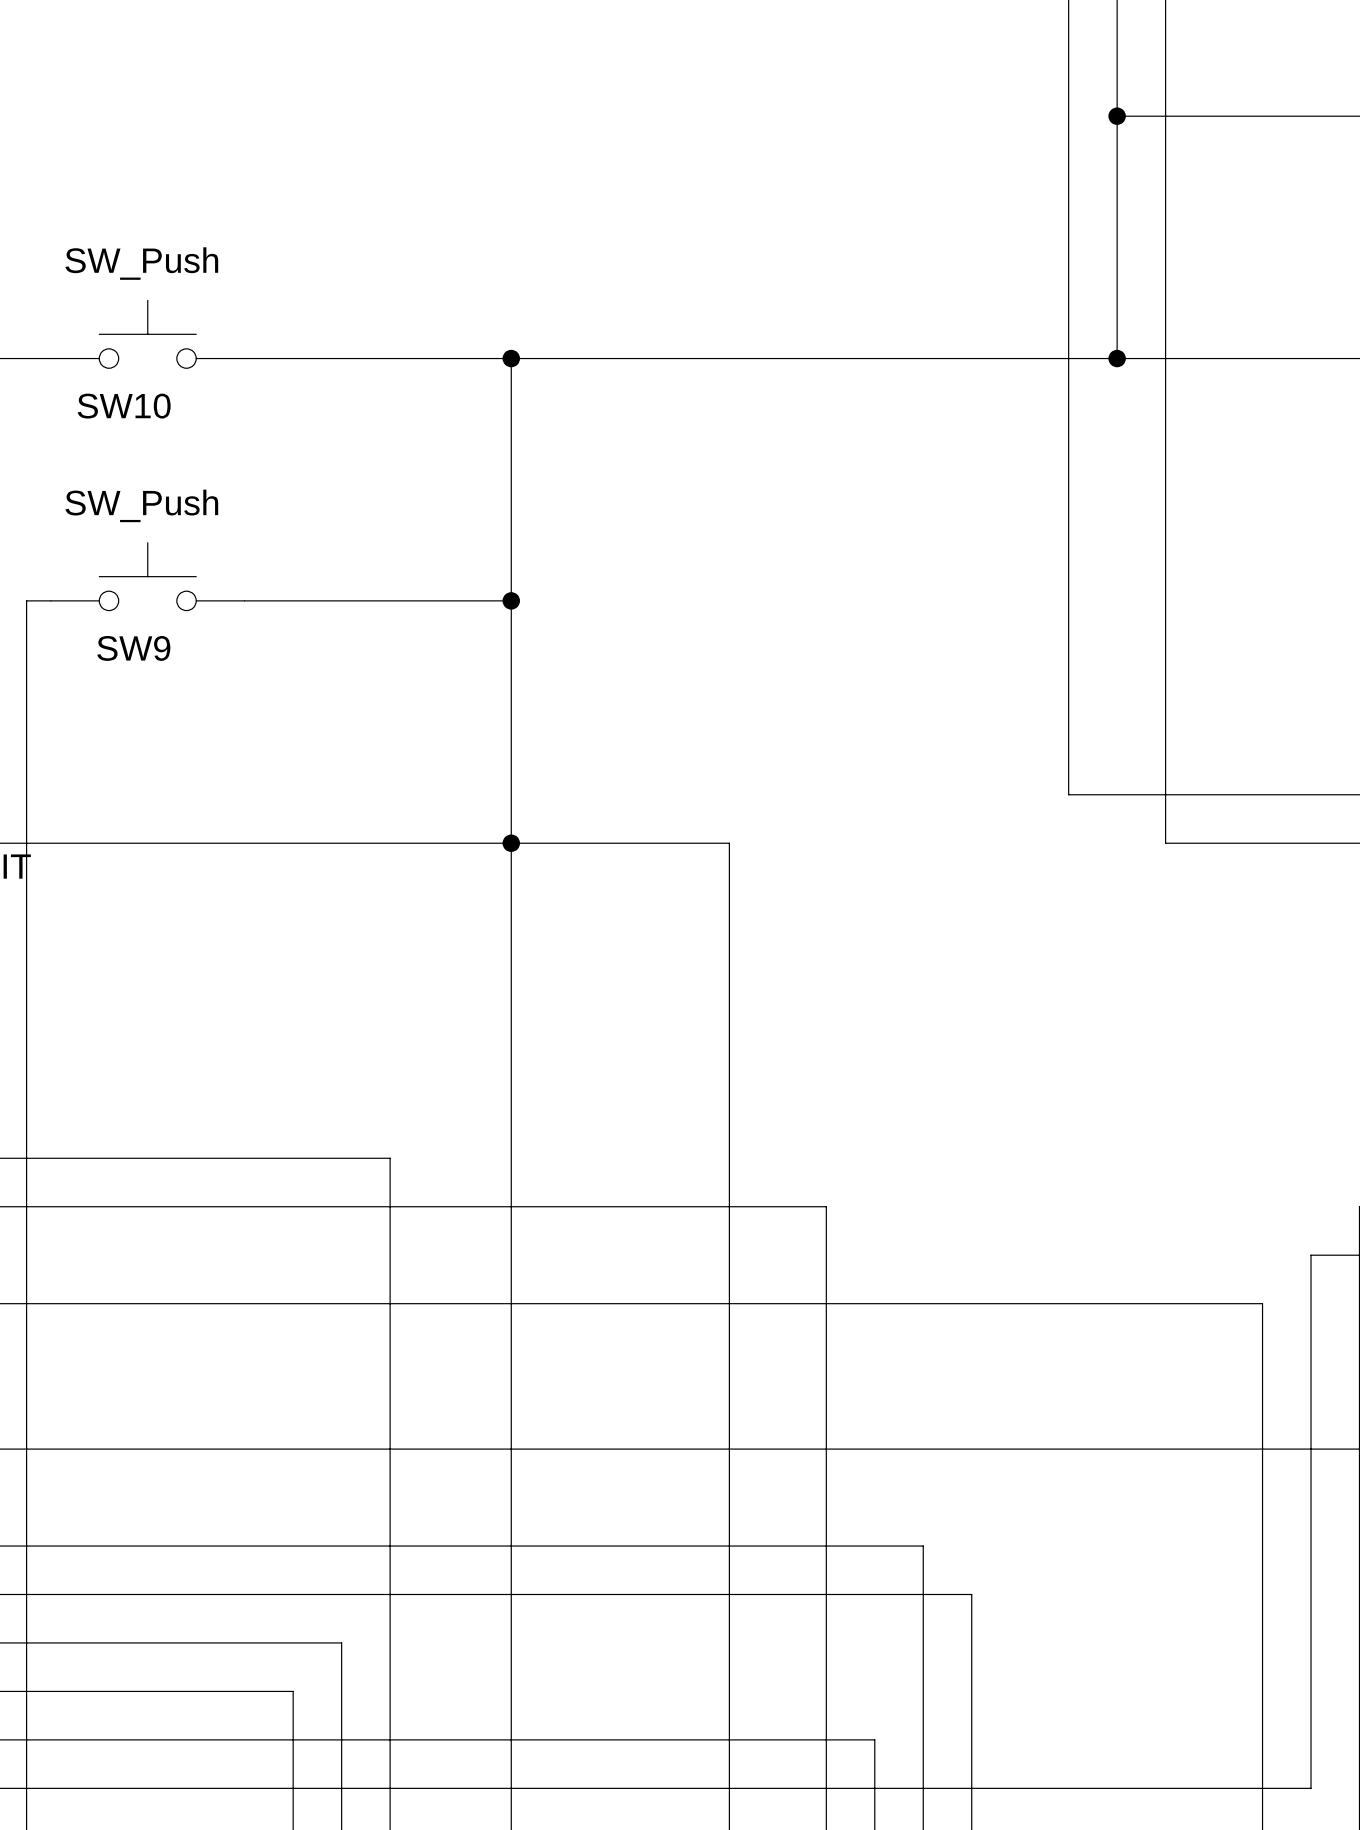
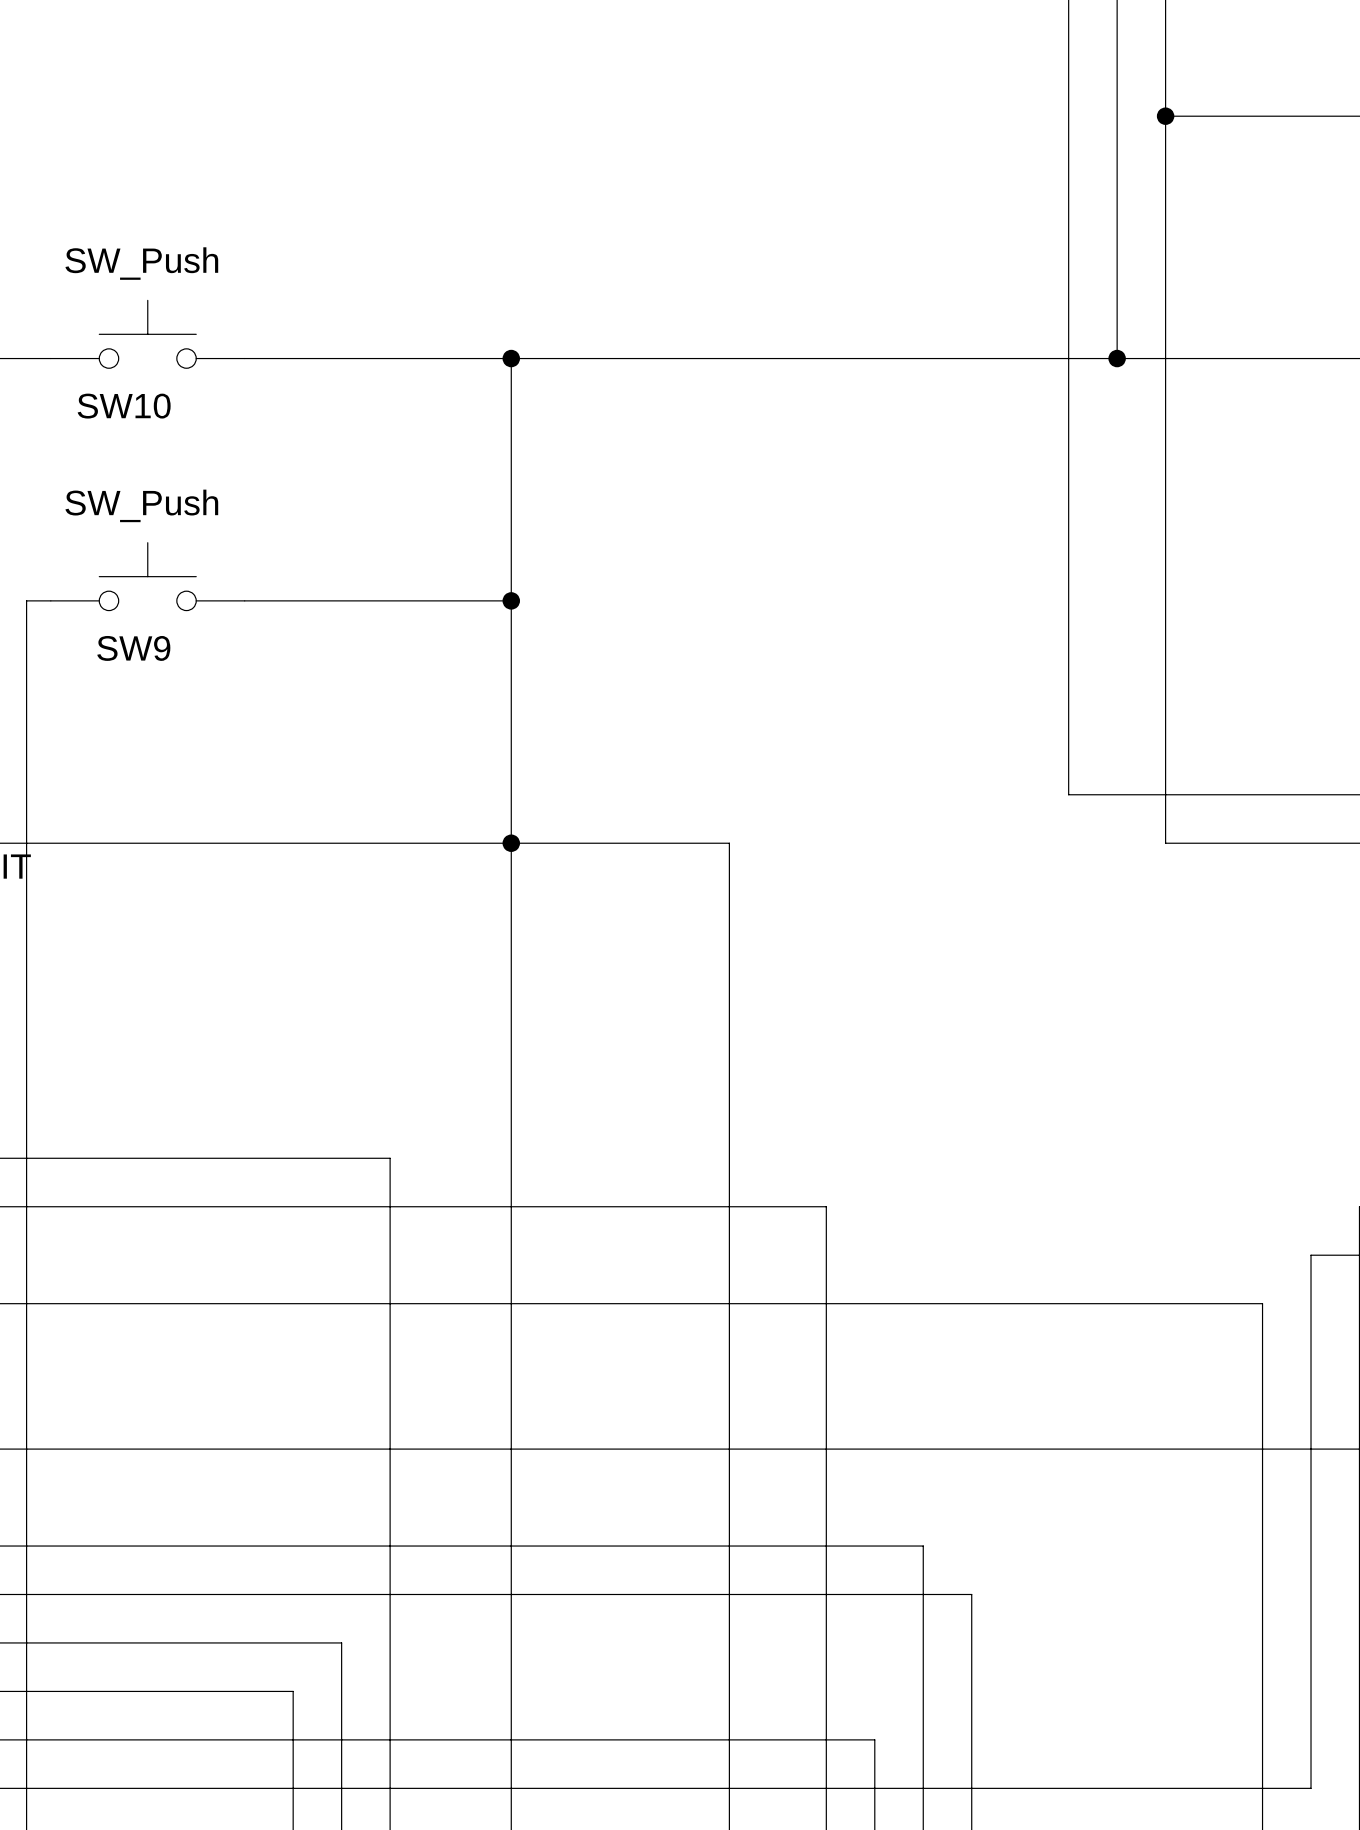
wire: (1117, 116) (1165, 116) -> none
junction position: (1117, 116) -> (1165, 116)

